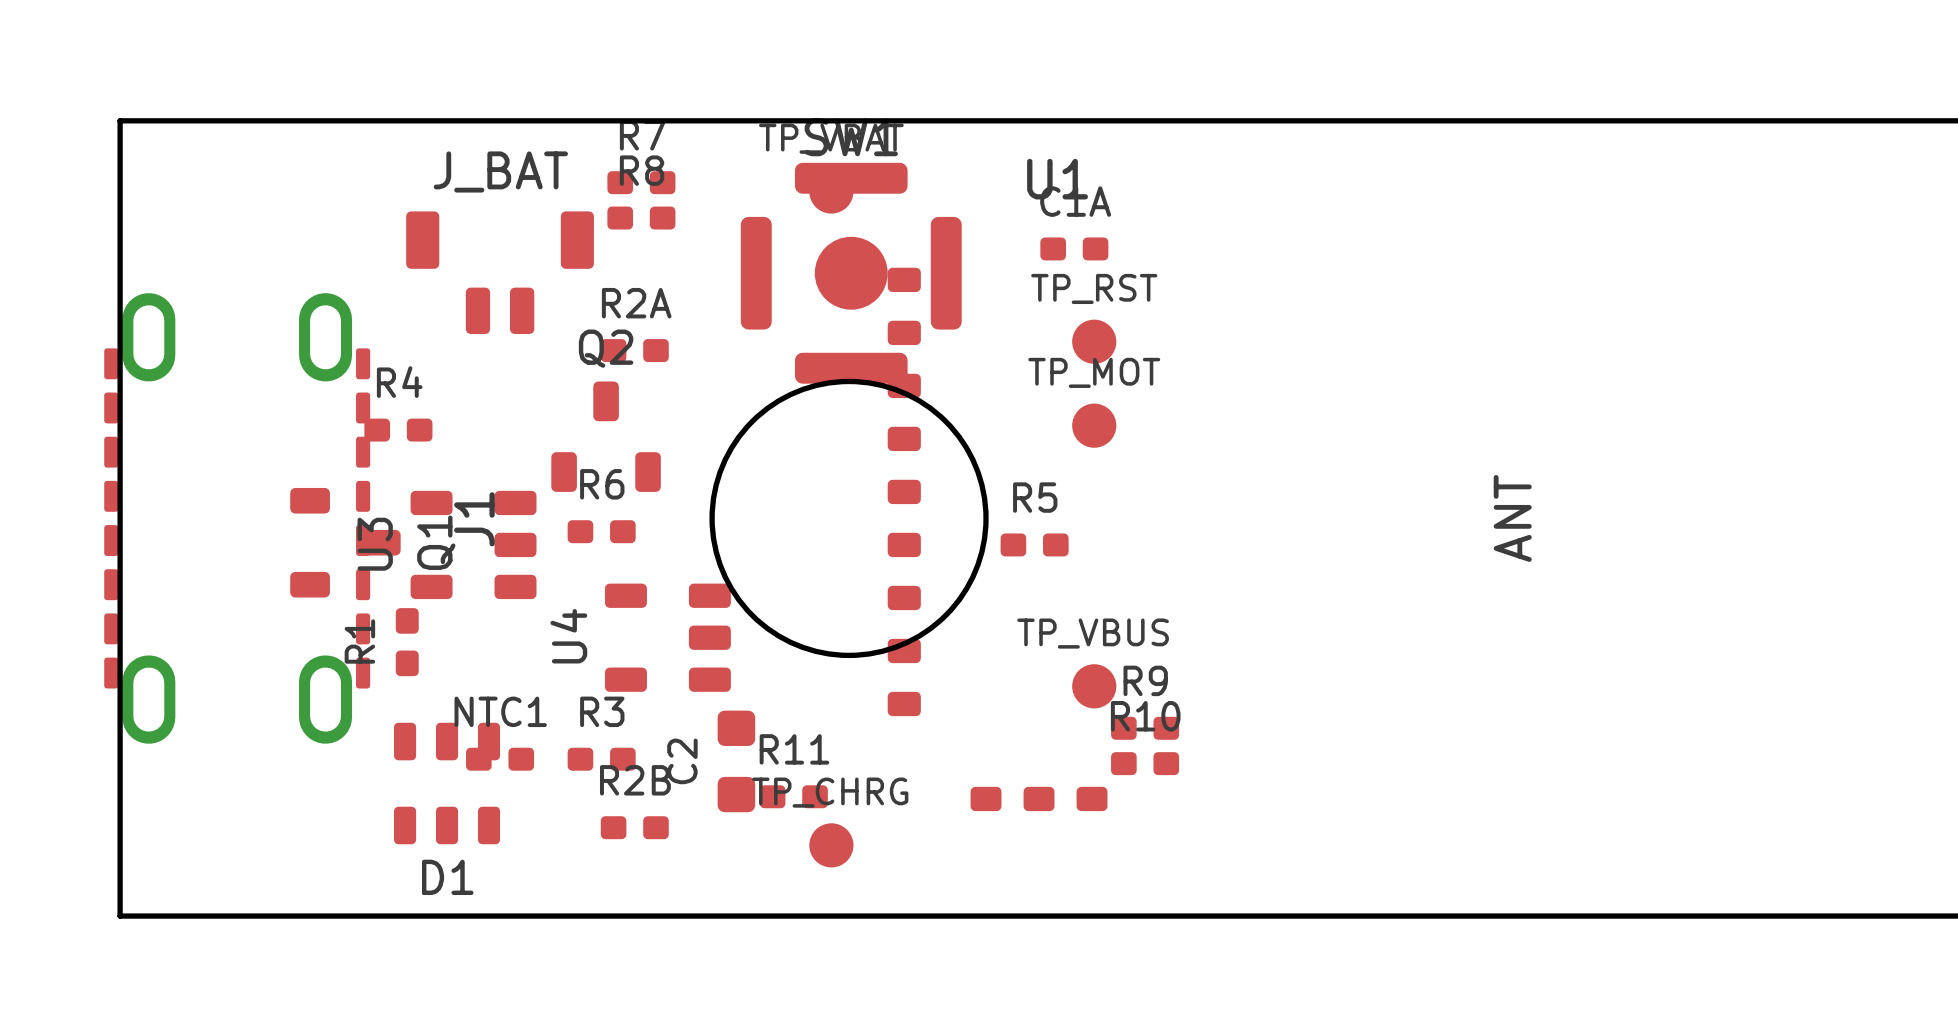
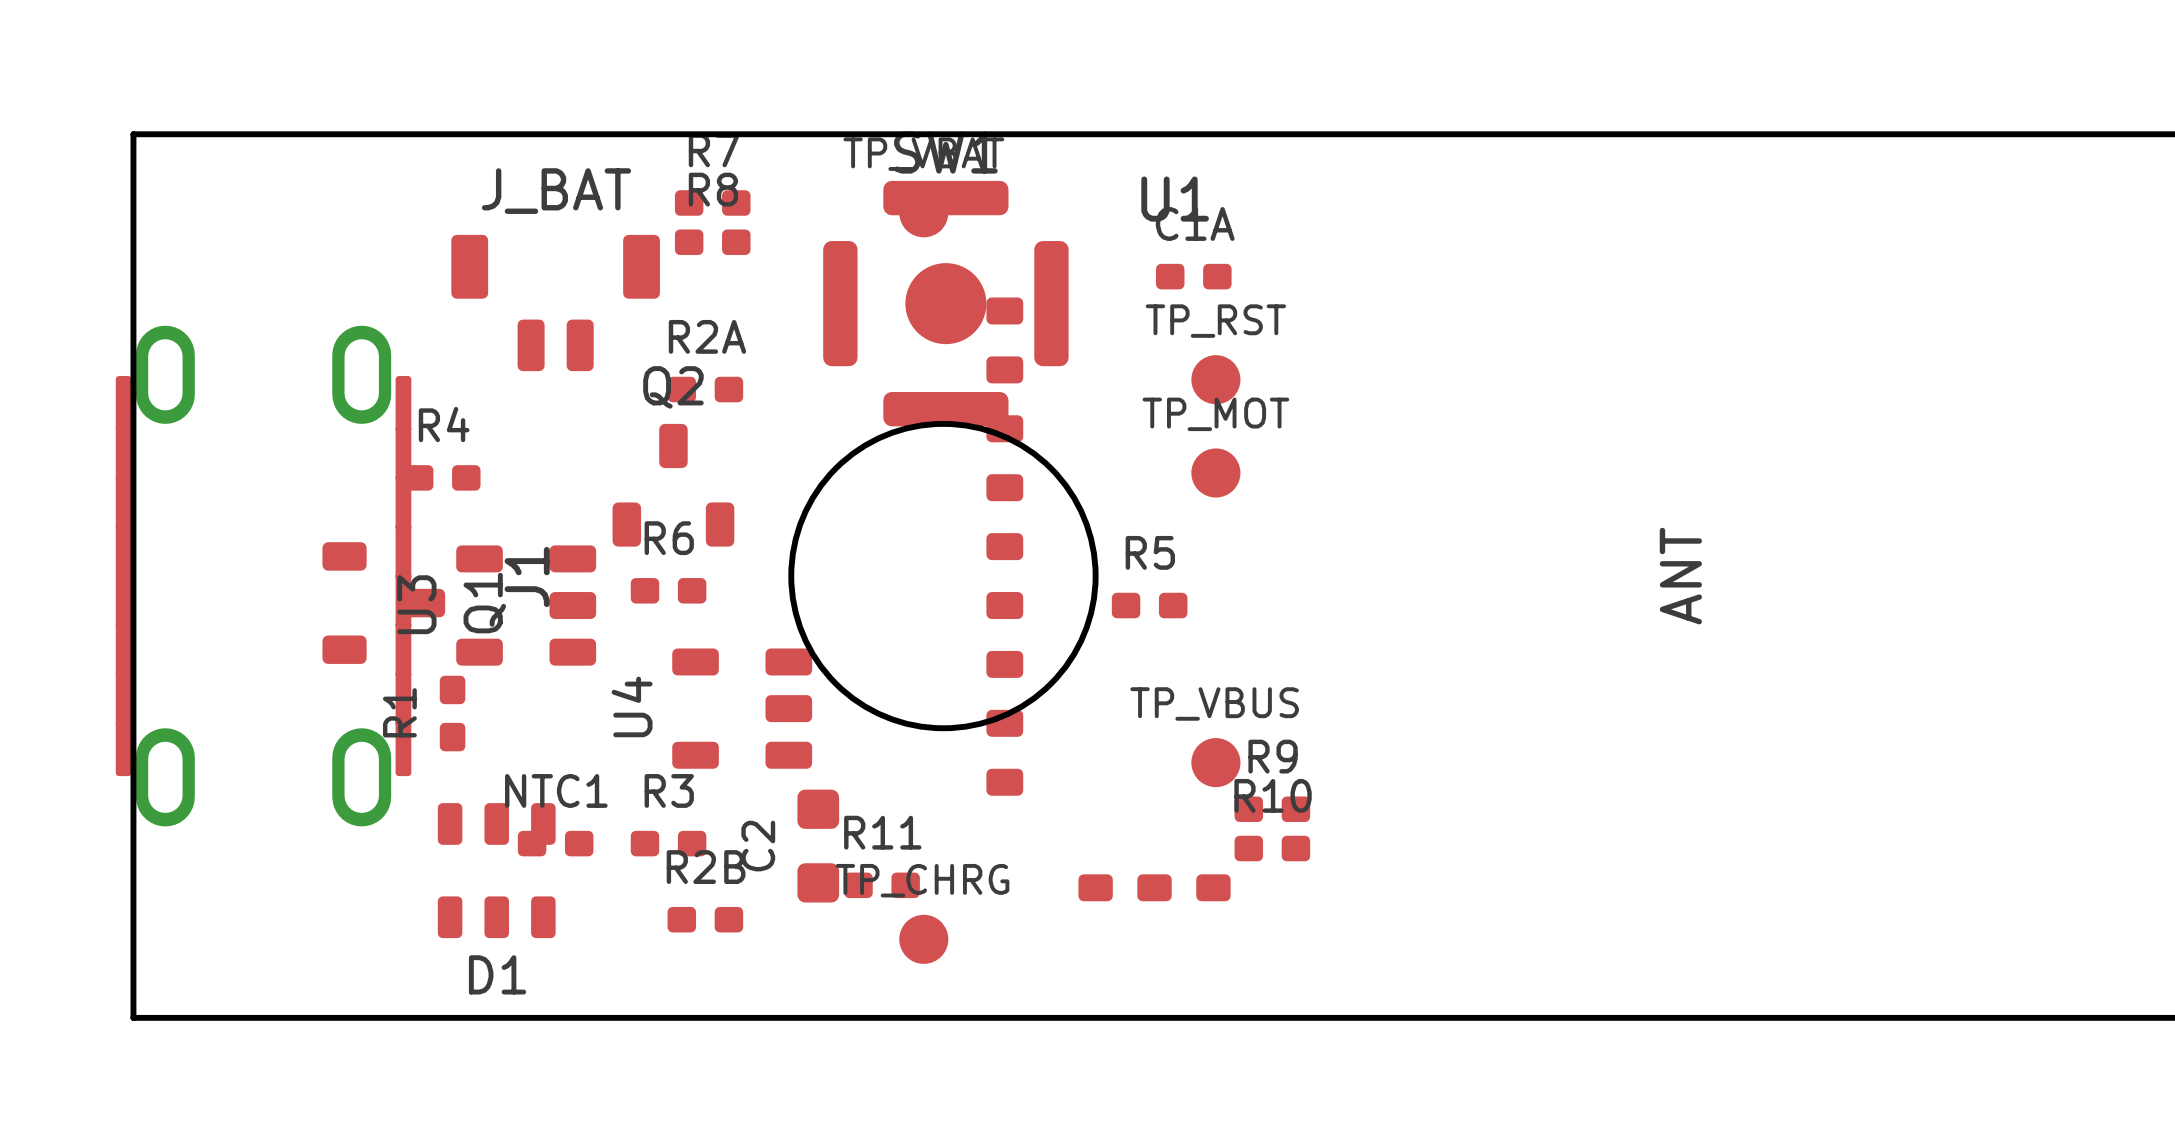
J1 footprint: [104, 293, 371, 744] -> [115, 325, 412, 827]

